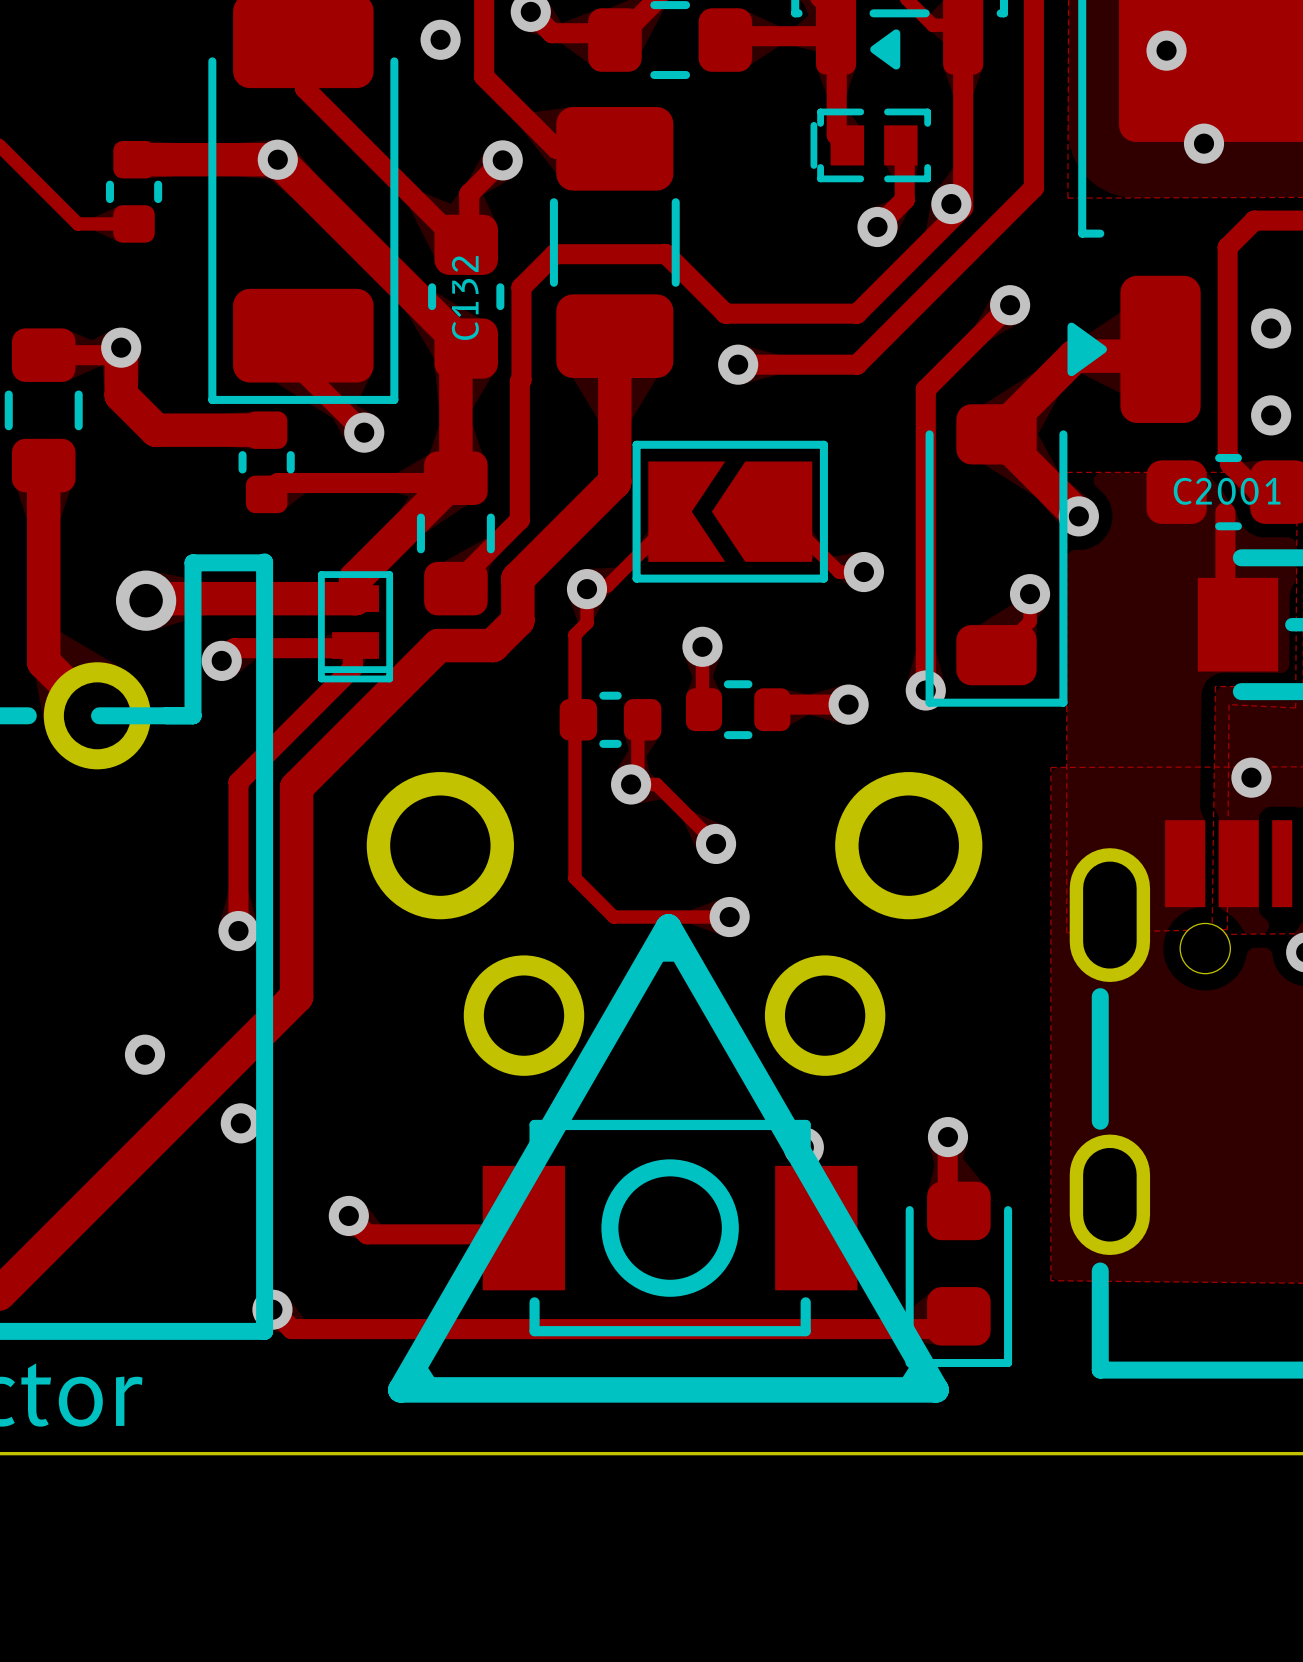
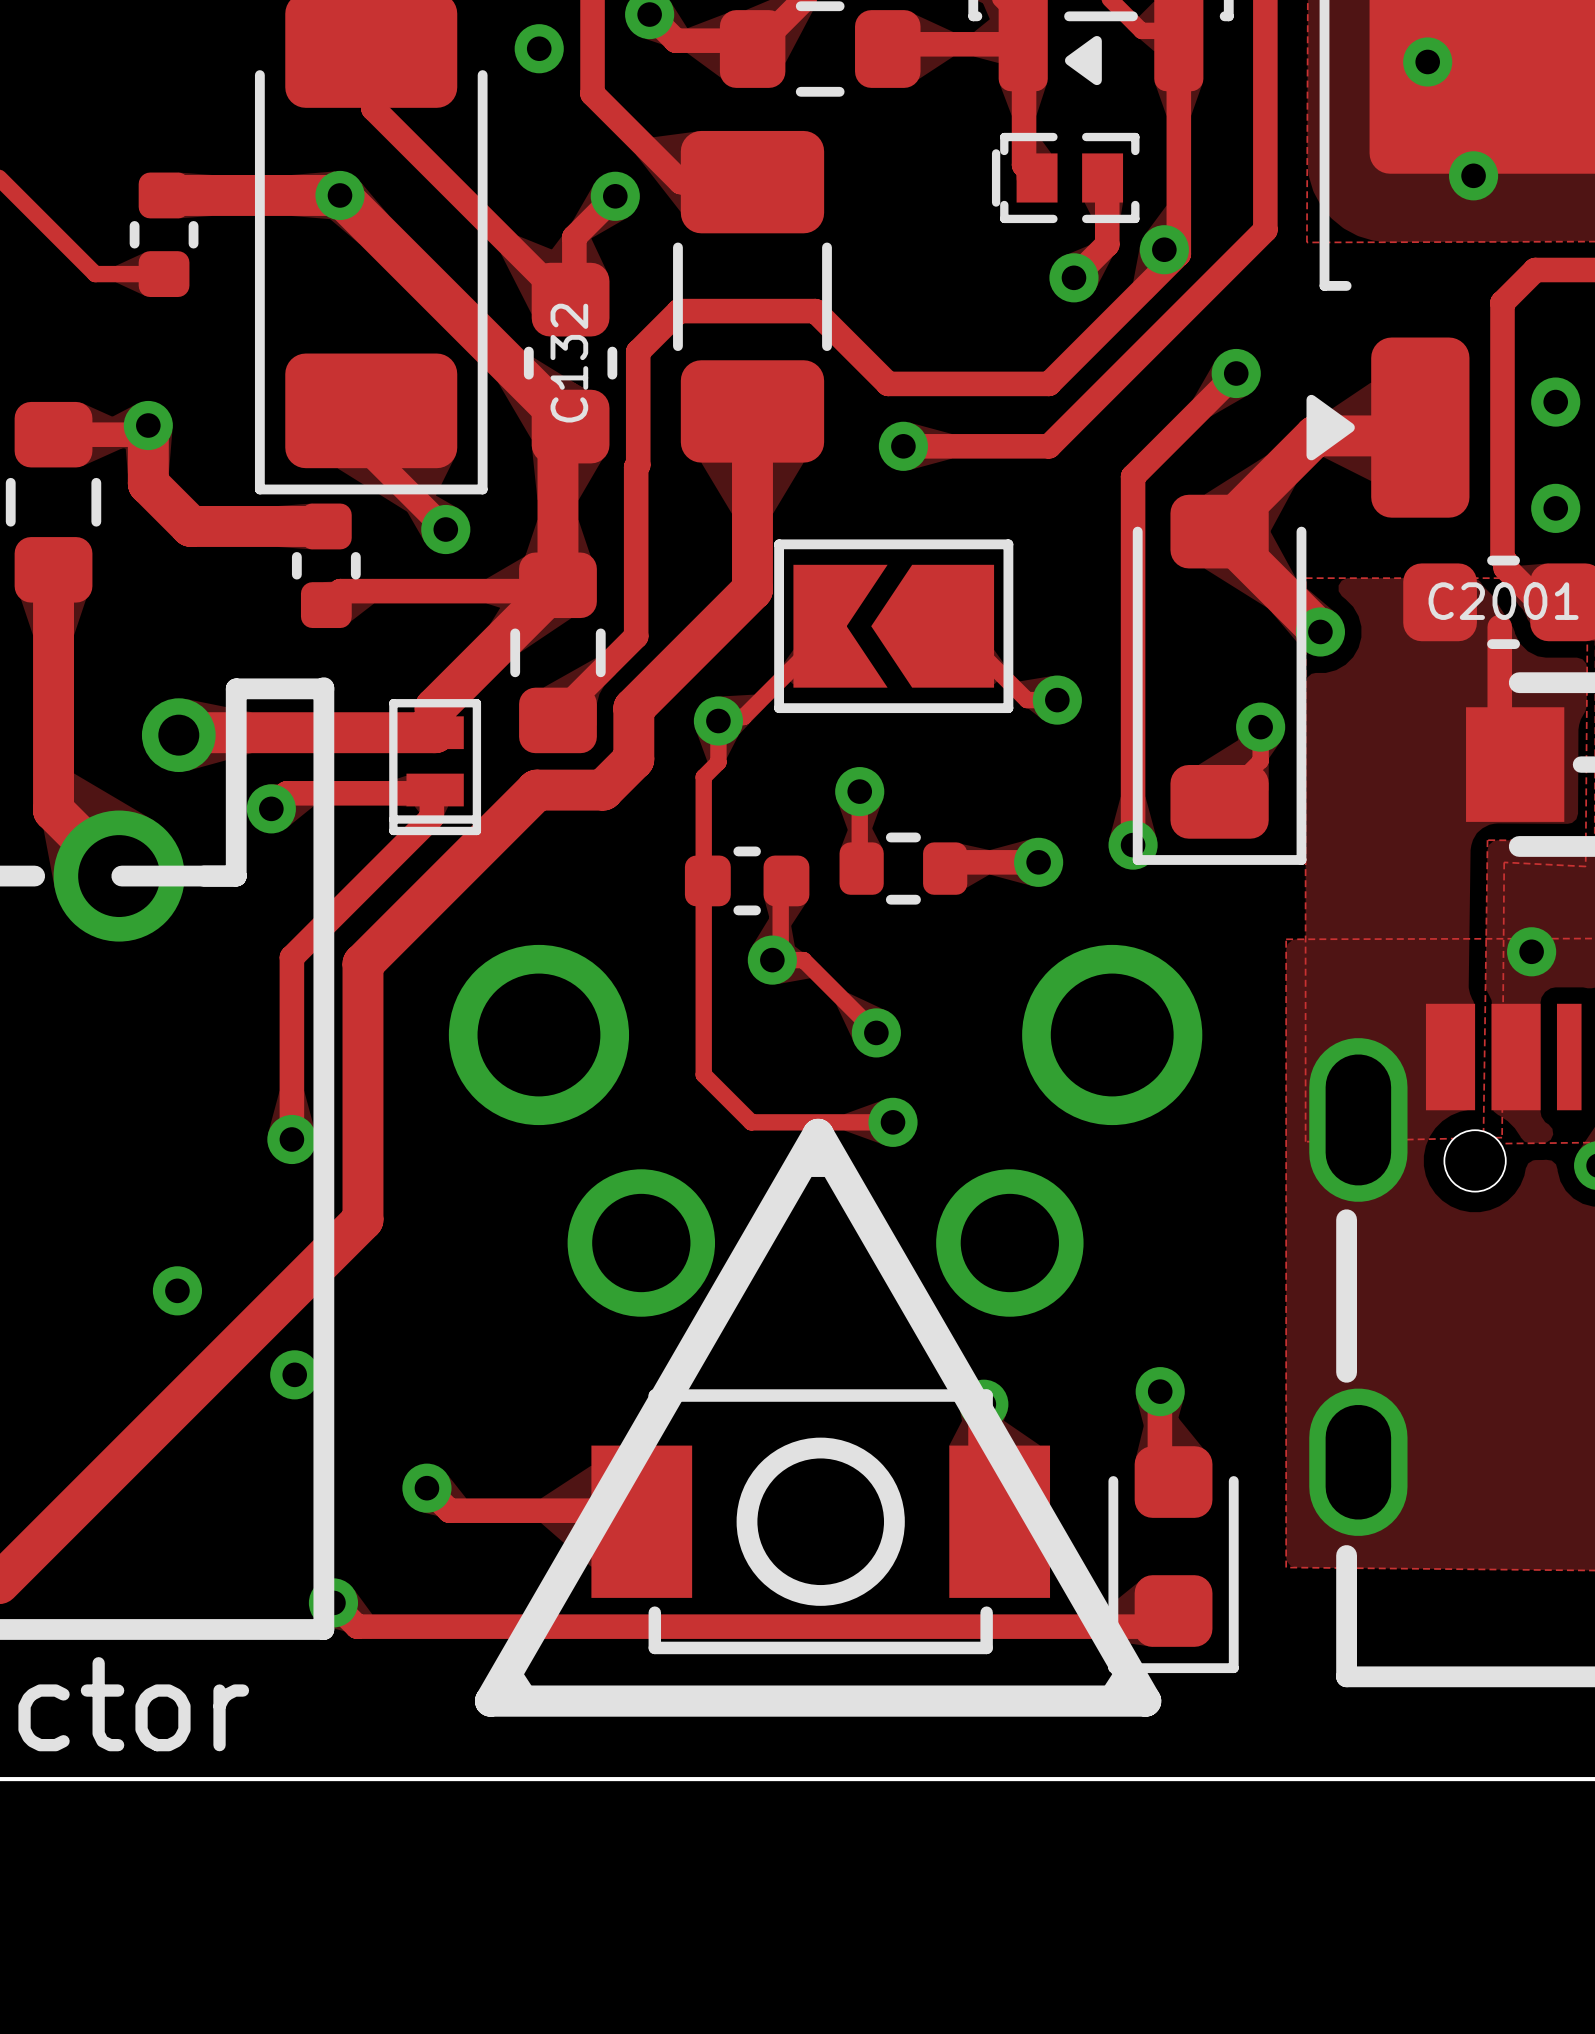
part position: (670, 1228) -> (820, 1521)

